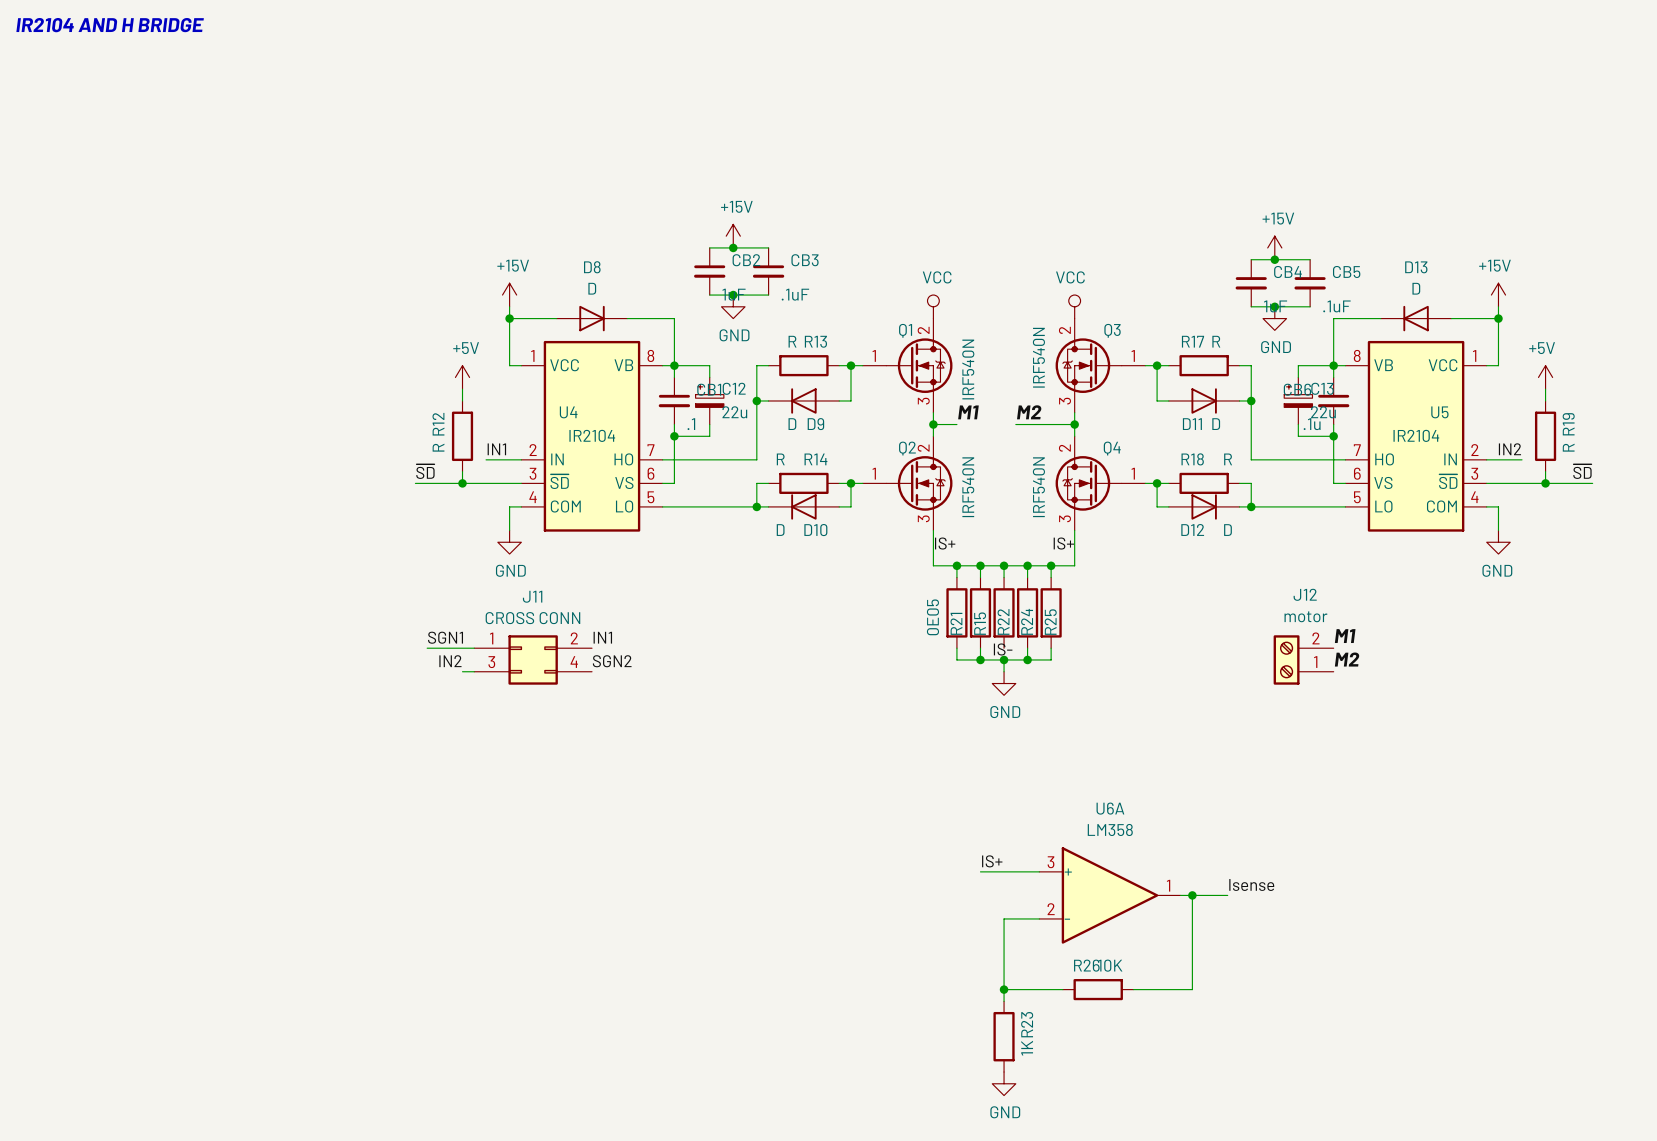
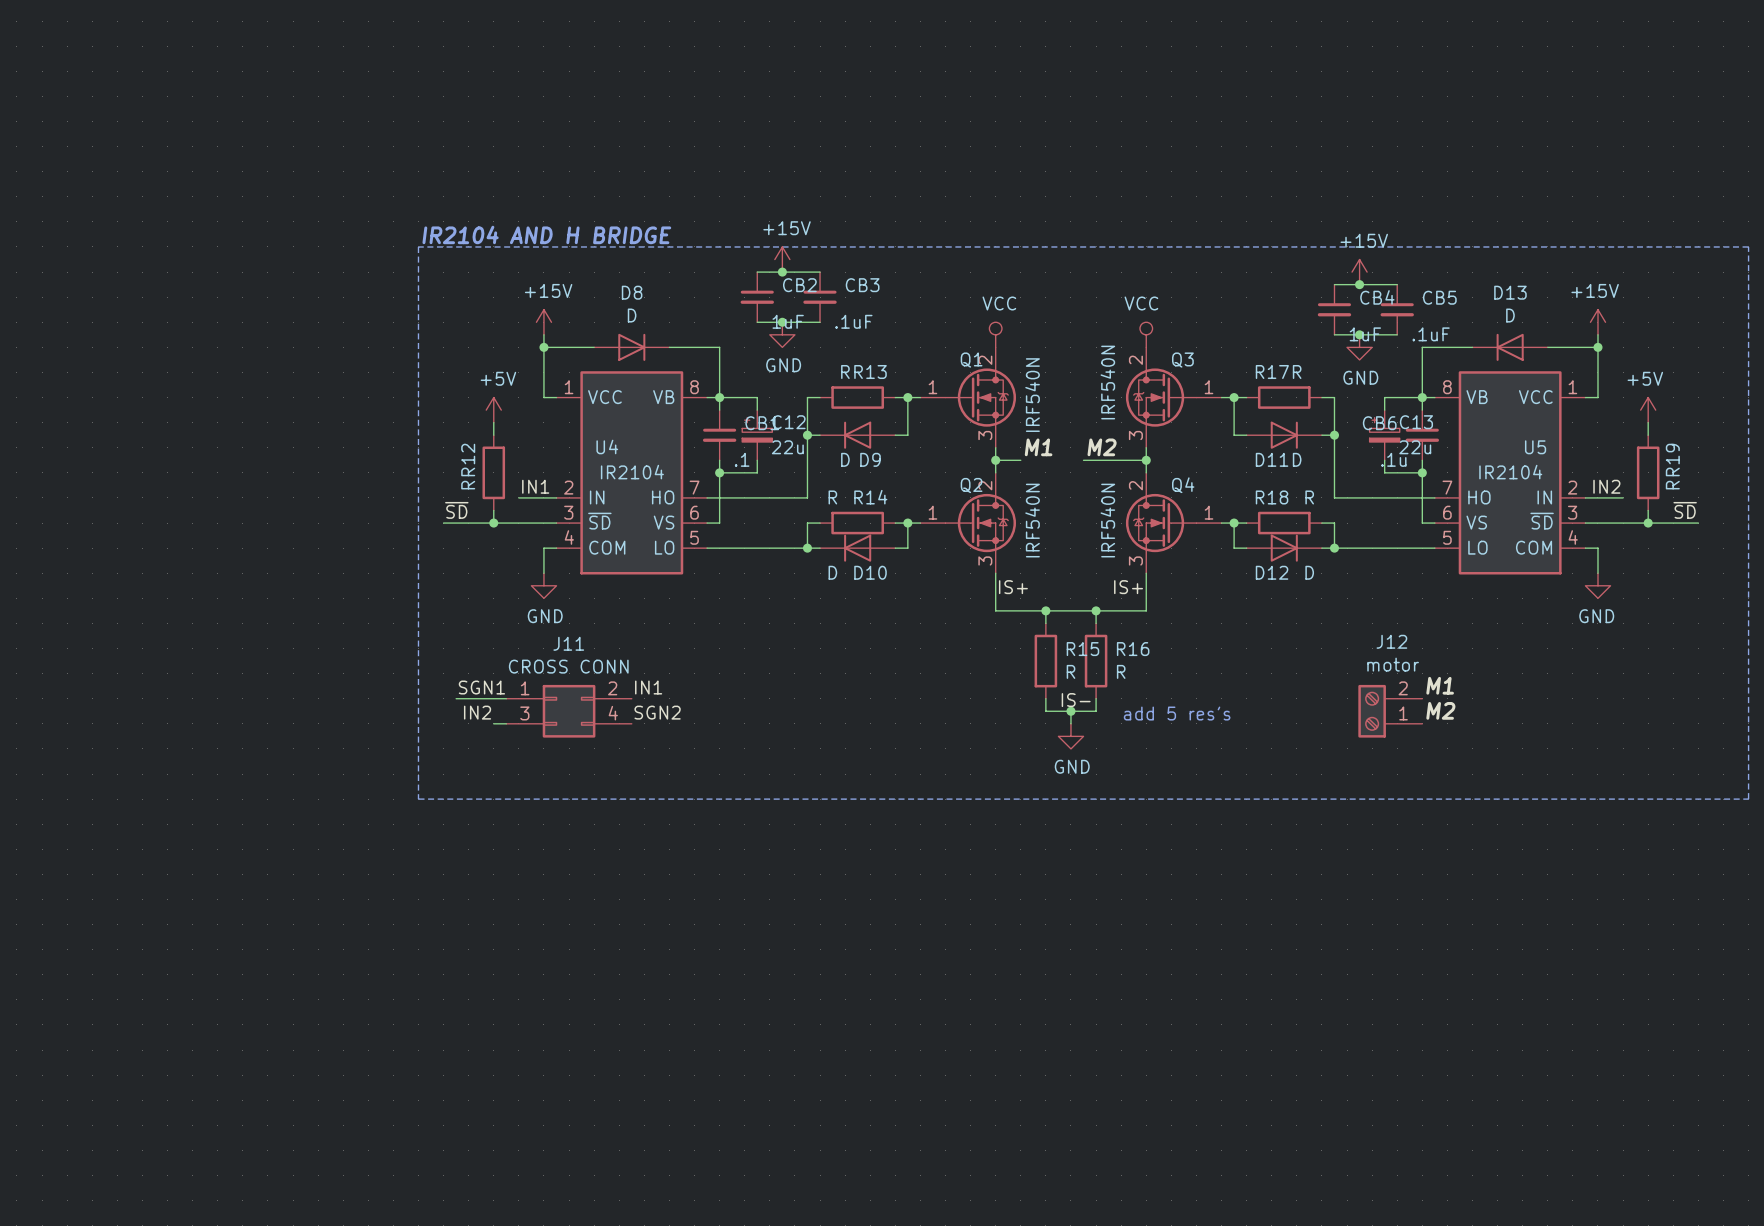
text: IR2104 AND H BRIDGE (110, 25) -> none
text: none -> IR2104 AND H BRIDGE (546, 234)
line: none -> (418, 246) (418, 799) (1748, 799) (1748, 246) (418, 246)
wire: (956, 565) (956, 577) -> none
junction: (956, 565) -> none
wire: (1004, 565) (1004, 577) -> none
junction: (1004, 565) -> none
wire: (1051, 565) (1051, 577) -> none
junction: (1051, 565) -> none
R21: 0E05 (956, 612) -> none
R22: (1004, 612) -> none
R25: (1051, 612) -> none
R24 name: R24 (1027, 621) -> R16 (1133, 649)
R15 name rotation: 0° (980, 623) -> 90° clockwise (1082, 649)
R15 value: none -> R (1071, 671)
R24 value: none -> R (1121, 671)
wire: (956, 648) (956, 659) (980, 659) -> none
wire: (1051, 648) (1051, 659) (1027, 659) -> none
junction: (980, 659) -> none
junction: (1027, 659) -> none
text: none -> add 5 res's (1177, 713)
label: IS+ (992, 861) -> none
wire: (980, 871) (1039, 871) -> none
label: Isense (1251, 884) -> none
U6A: LM358 (1109, 895) -> none
wire: (1180, 895) (1227, 895) -> none
wire: (1192, 895) (1192, 989) (1133, 989) -> none
junction: (1192, 895) -> none
wire: (1039, 918) (1004, 918) (1004, 1001) -> none
wire: (1004, 989) (1062, 989) -> none
junction: (1004, 989) -> none
R26: 10K (1098, 989) -> none
R23: 1K (1004, 1036) -> none
power symbol: GND (1004, 1083) -> none

